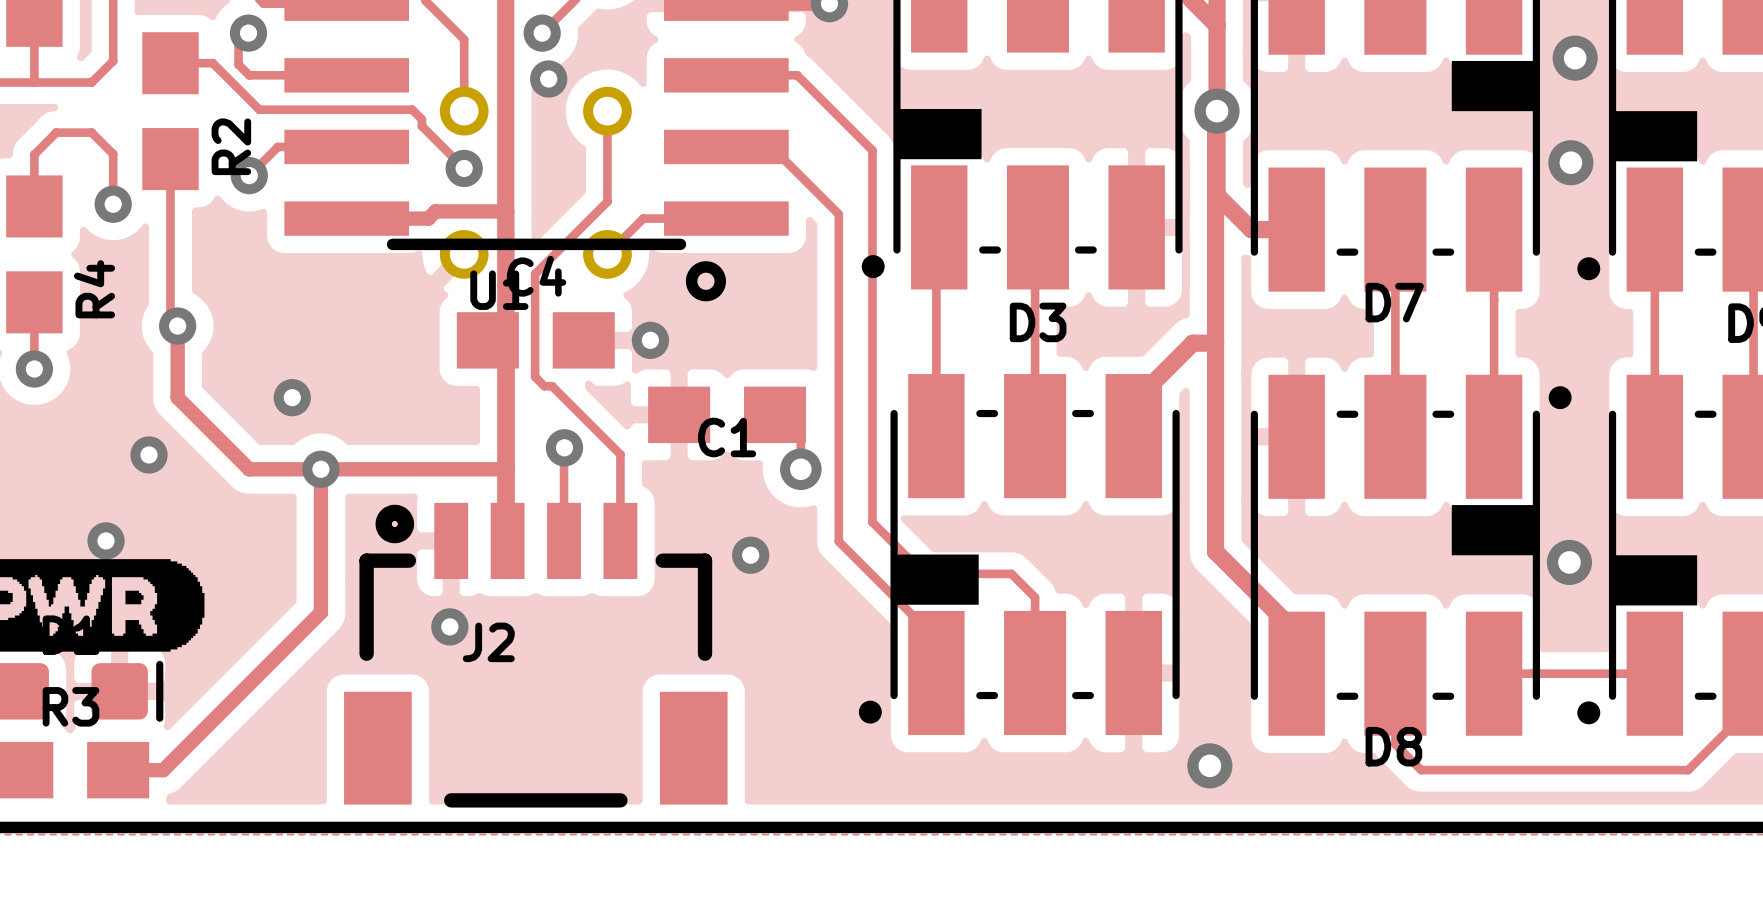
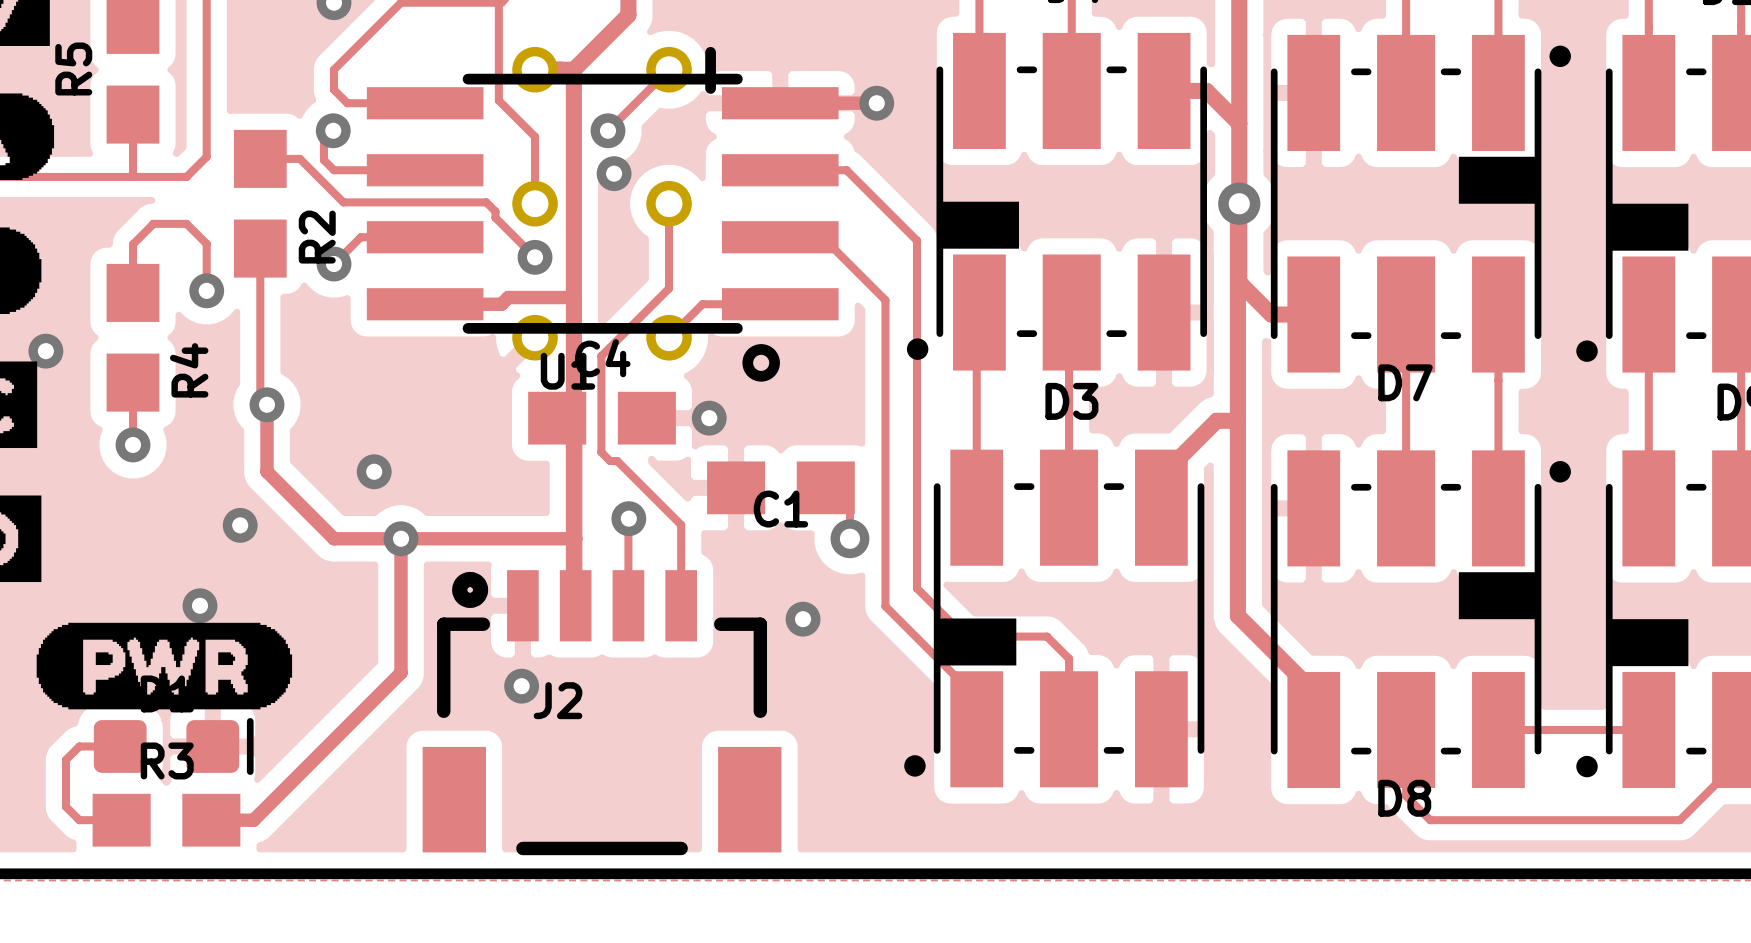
via: (1575, 58) -> none
via: (1570, 162) -> none
via: (1569, 562) -> none
via: (1209, 765) -> none

